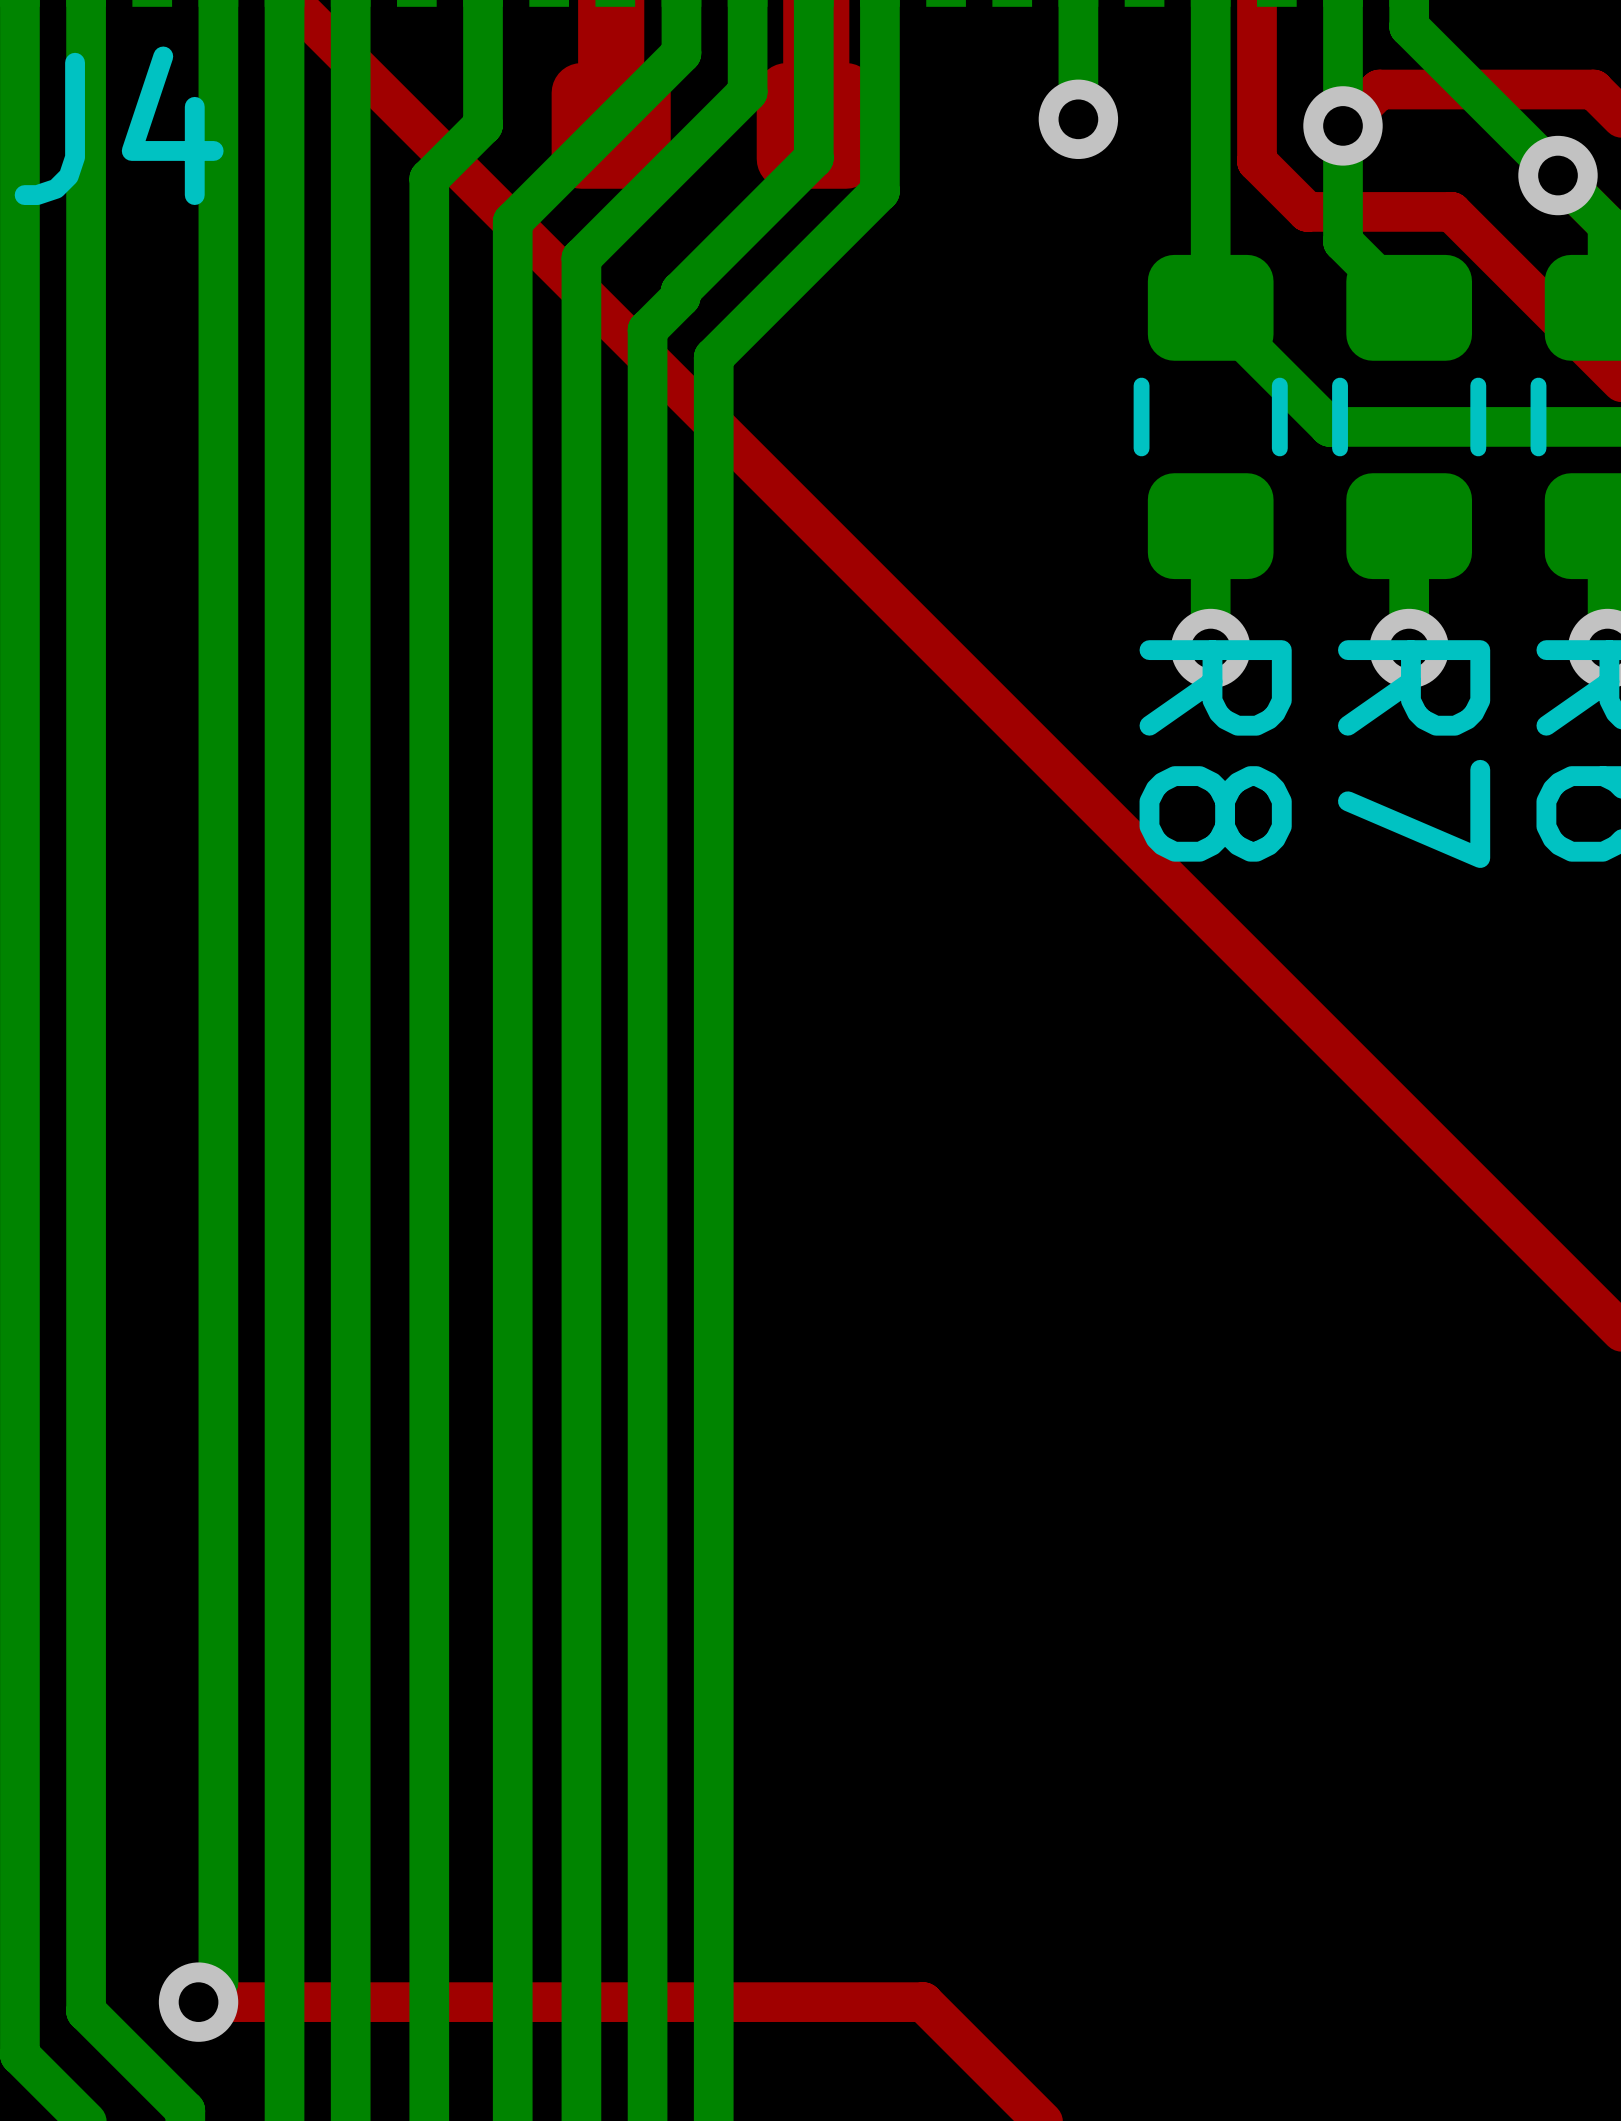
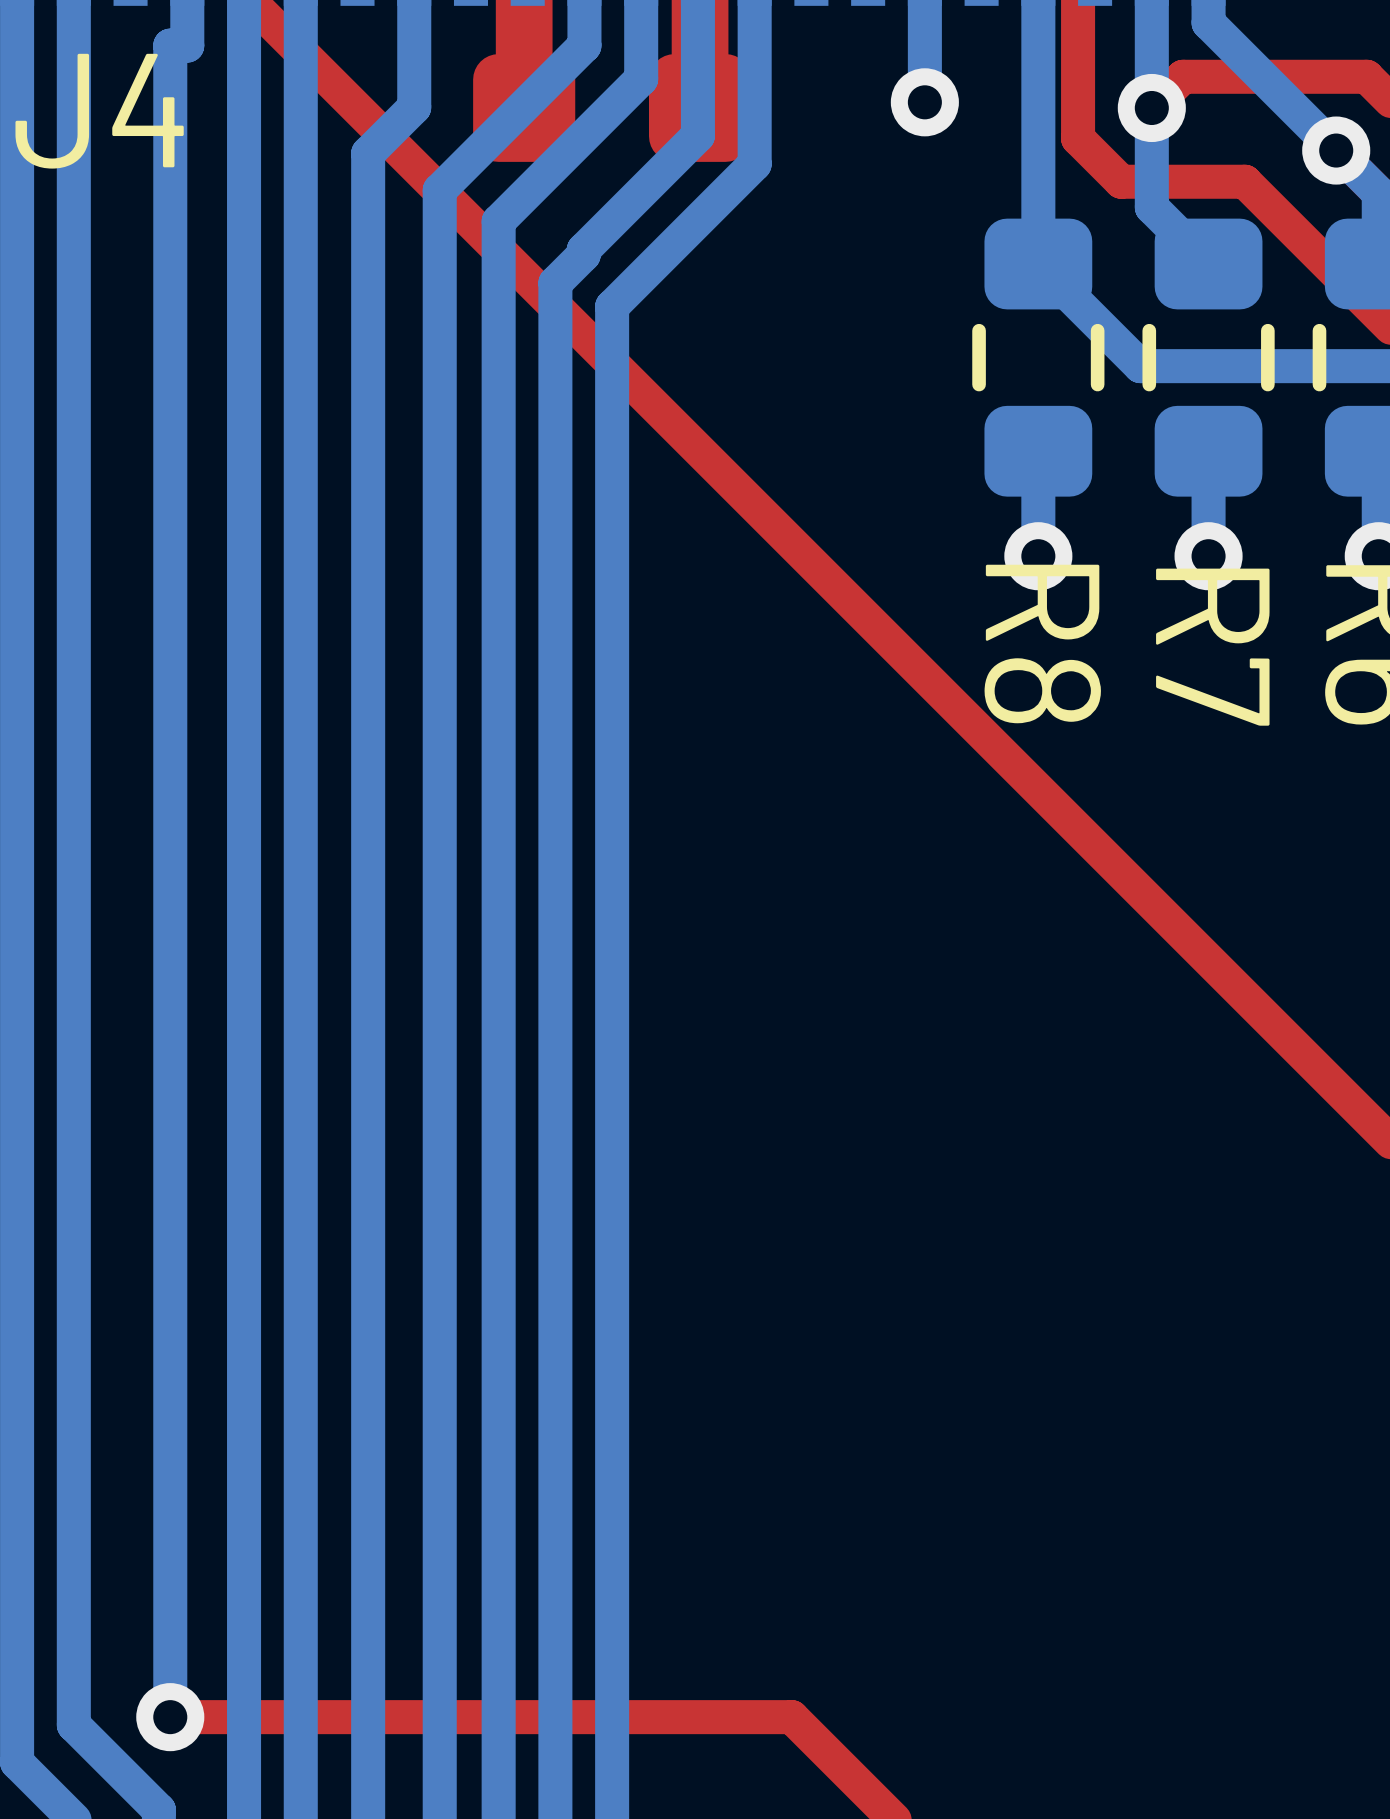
bottom track: (218, 53) (218, 1982) (198, 2002) -> (187, 45) (170, 45) (170, 1717)

